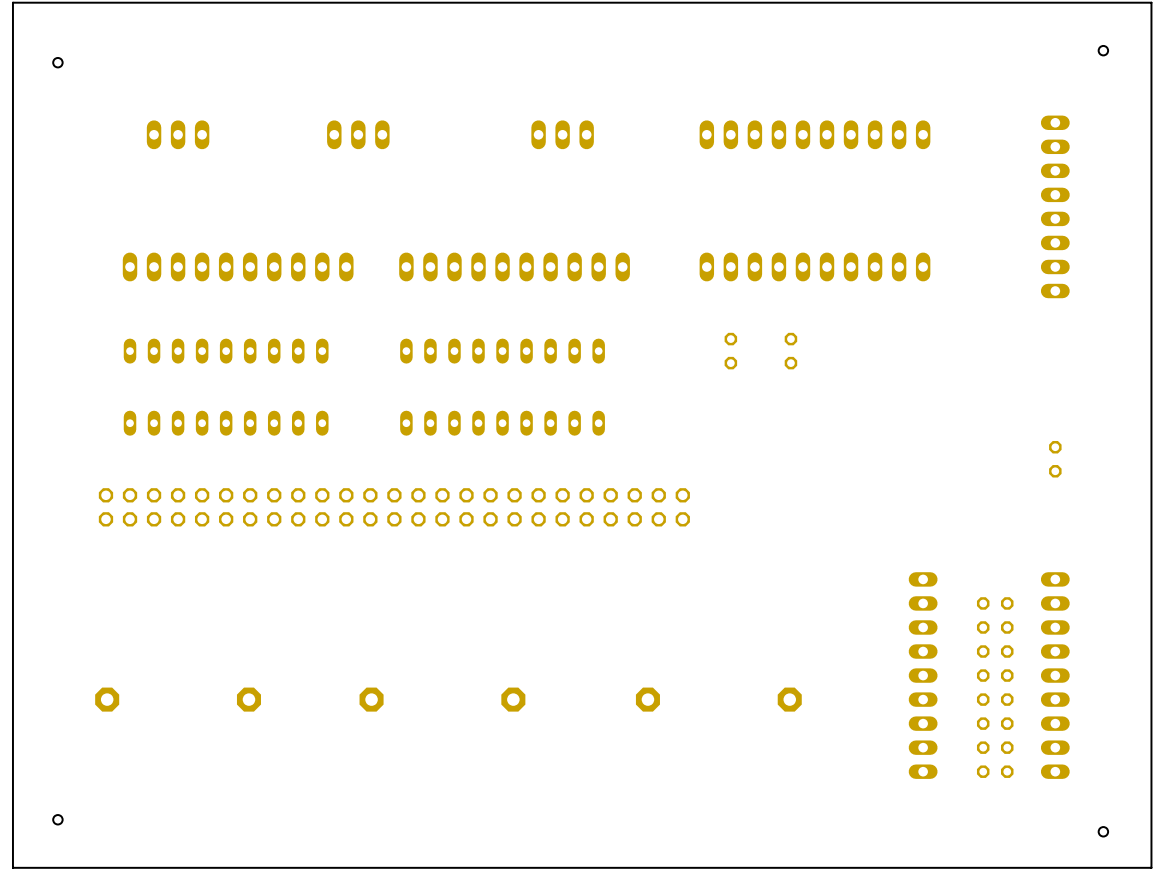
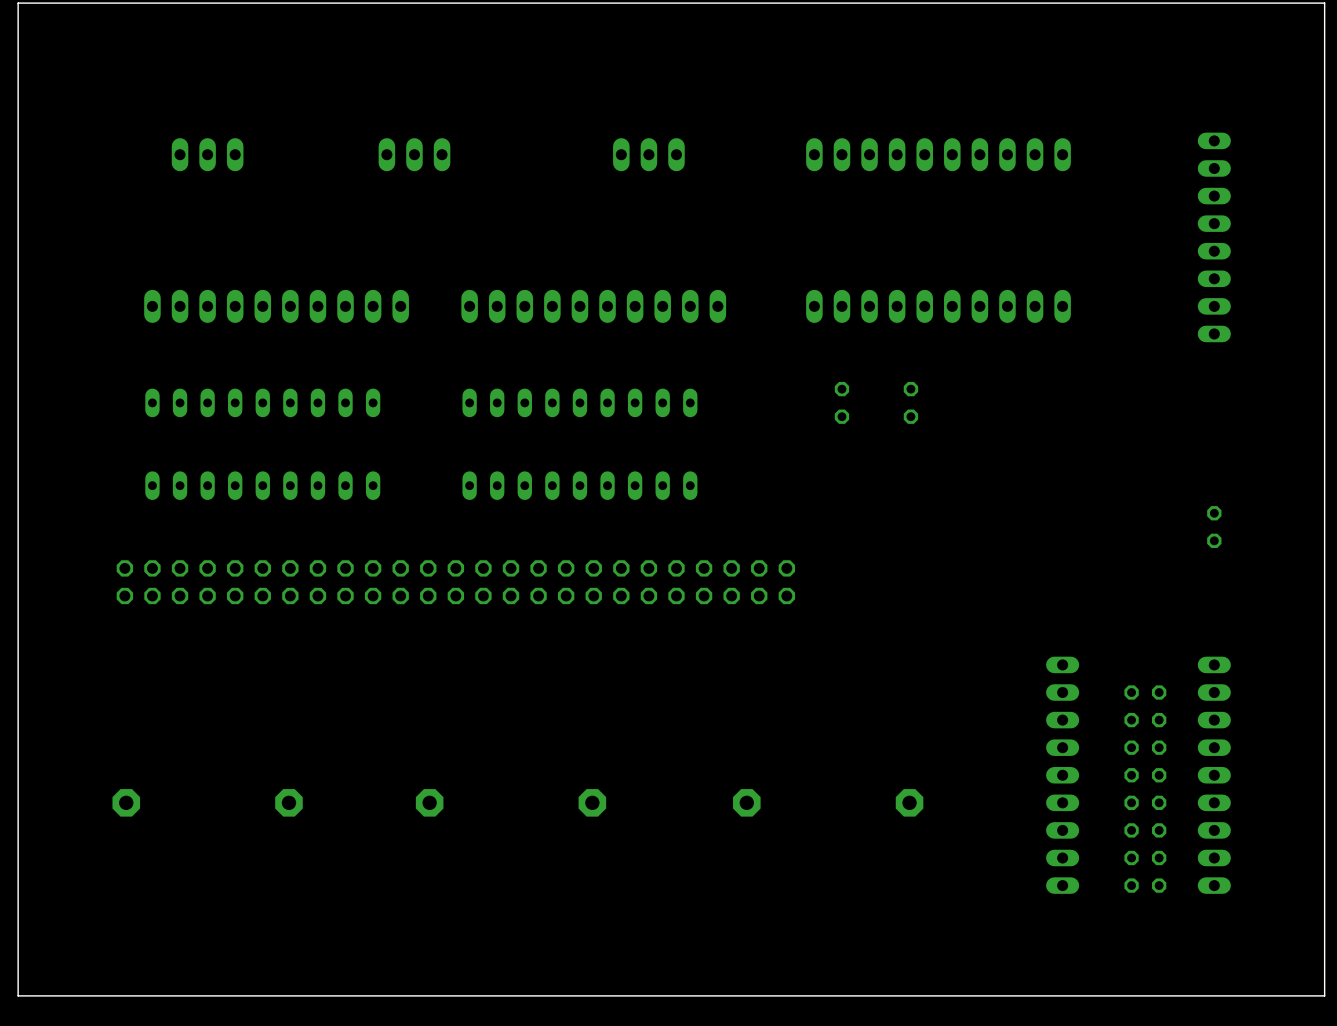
hole: (1103, 50) -> none
hole: (57, 62) -> none
hole: (57, 819) -> none
hole: (1103, 831) -> none

